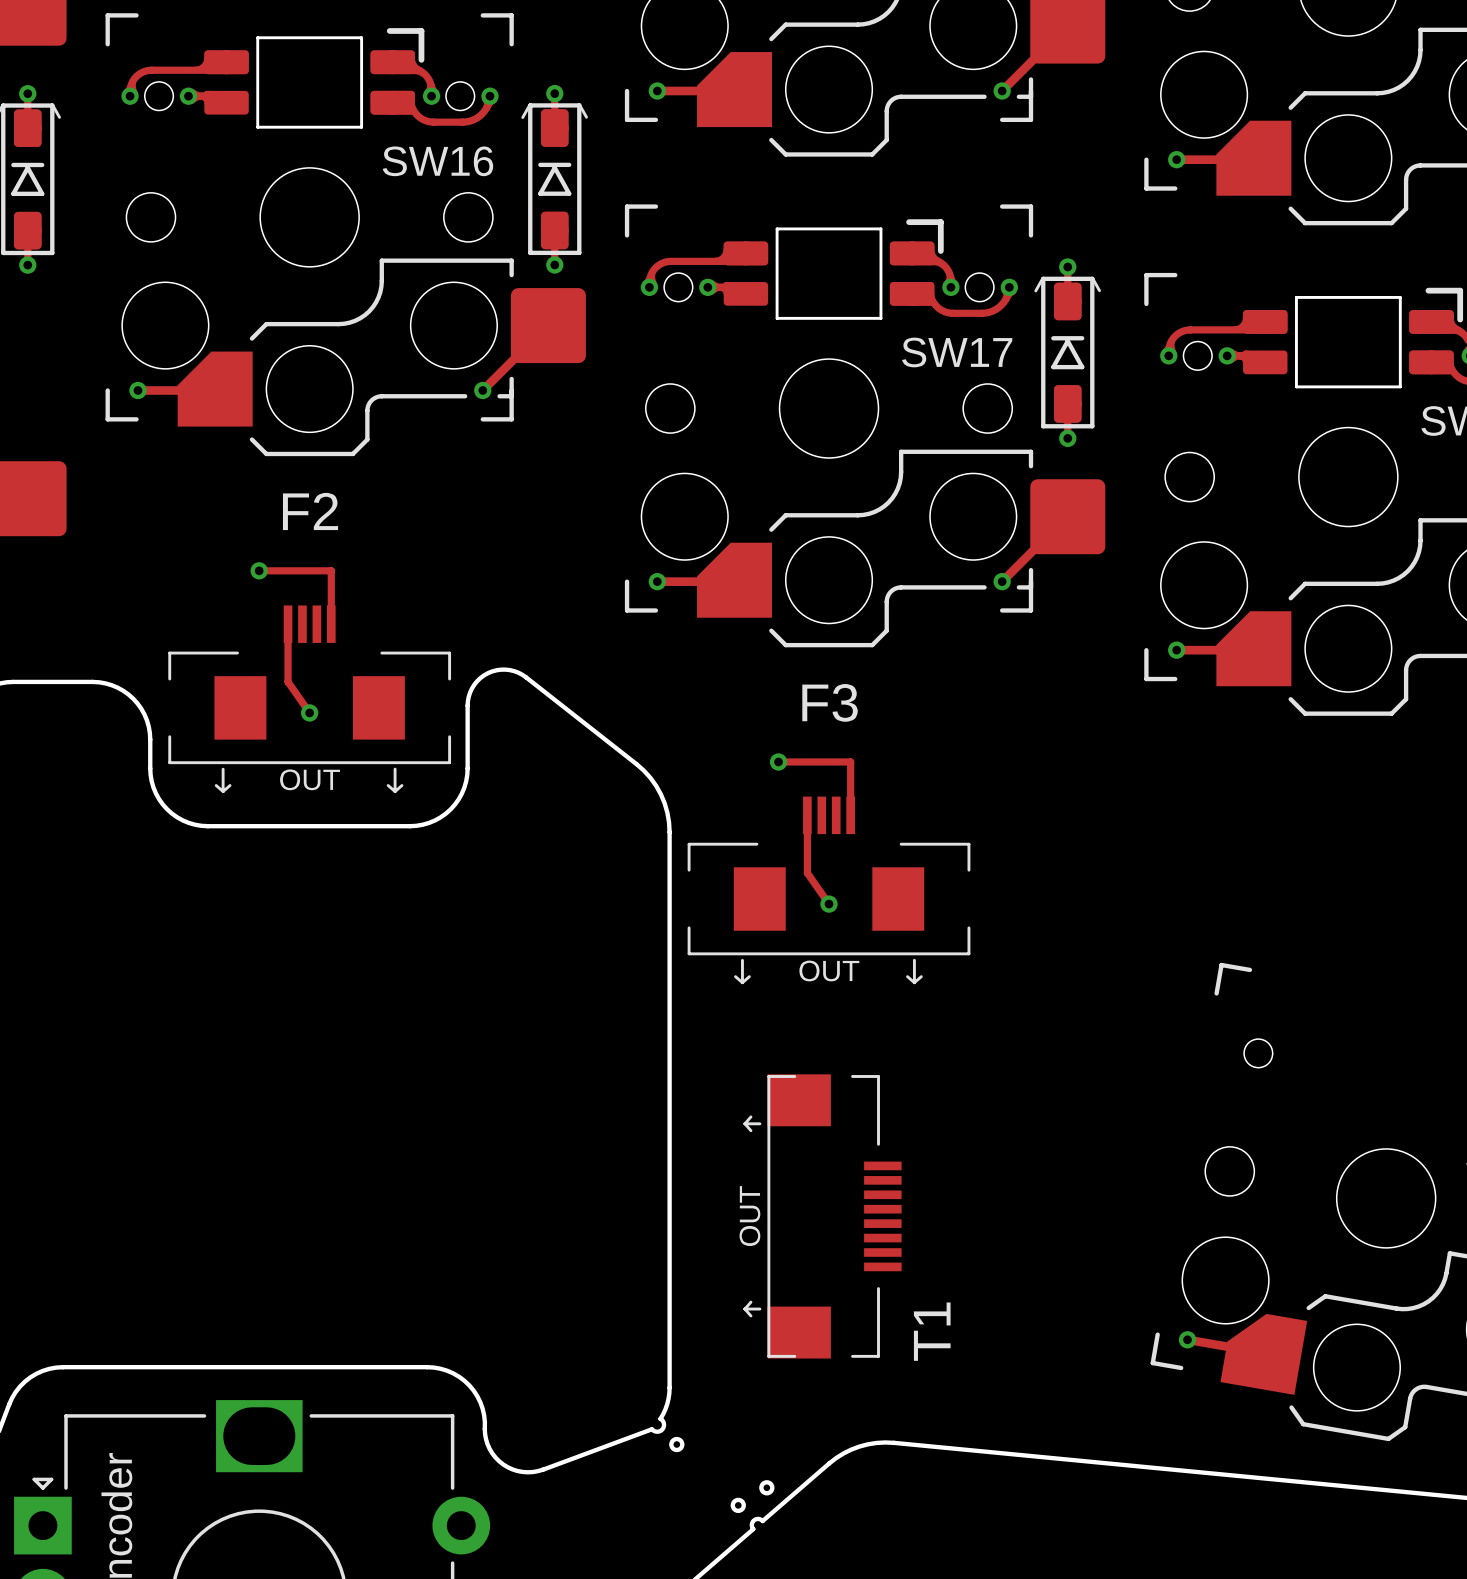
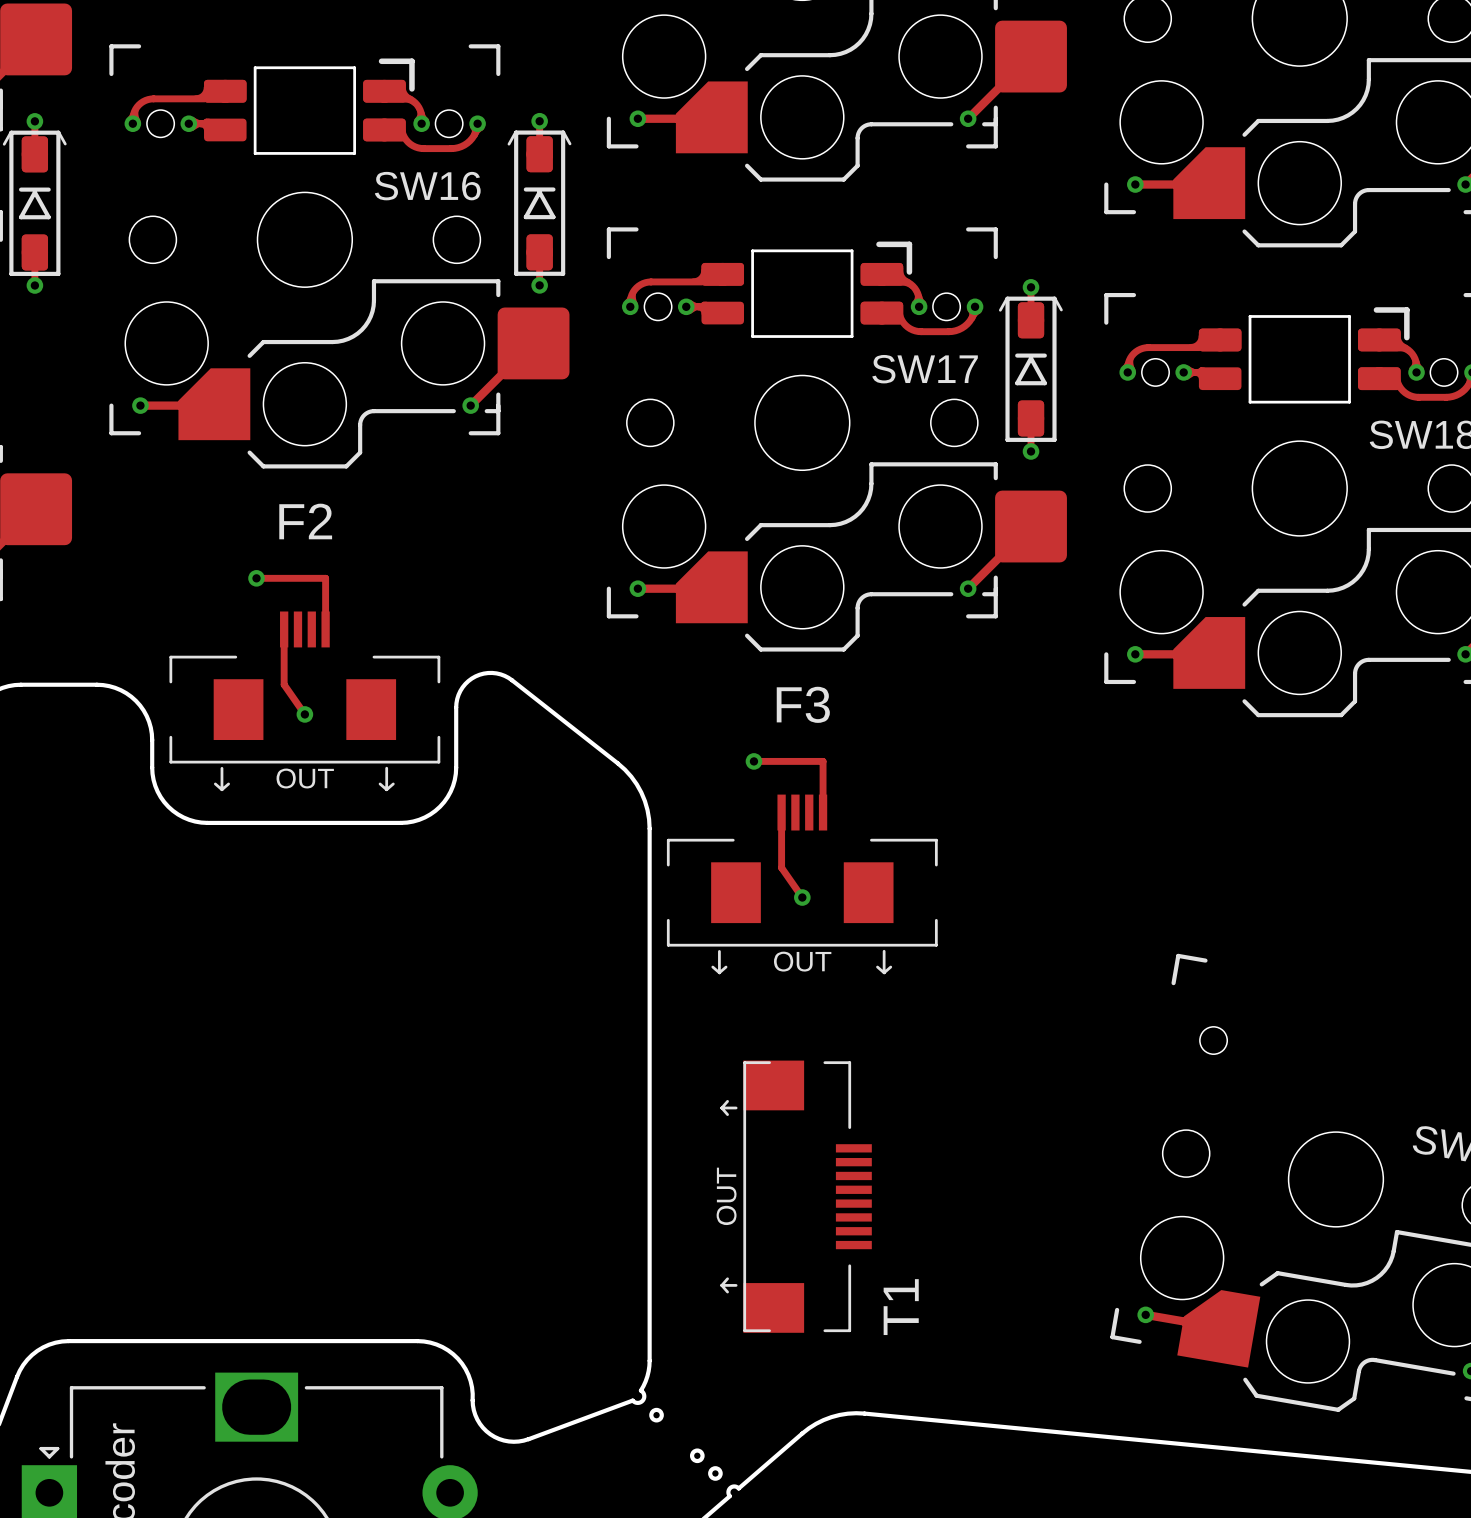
round board edge position: (766, 1487) -> (697, 1455)

